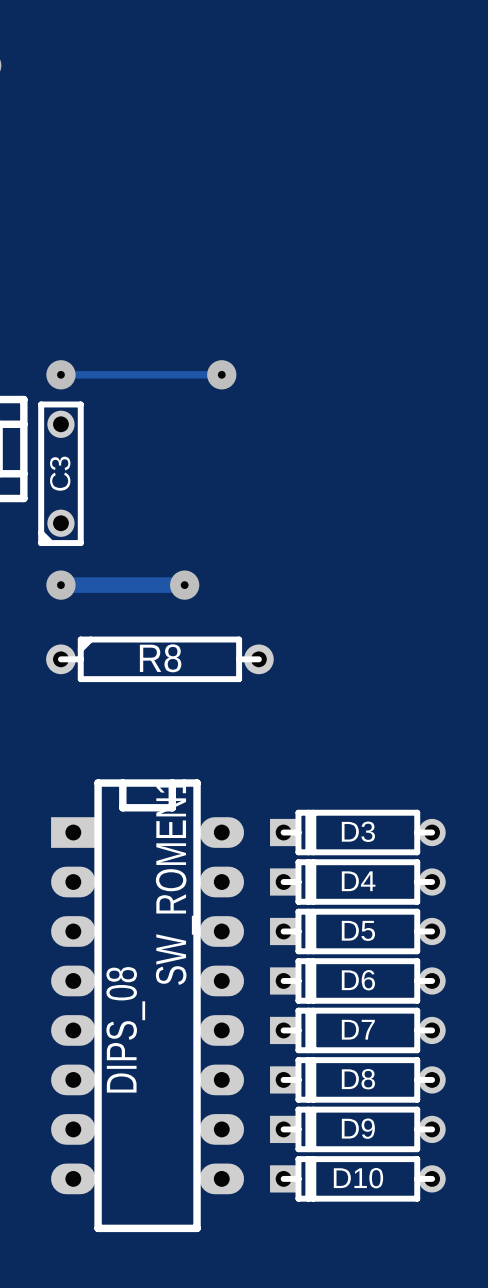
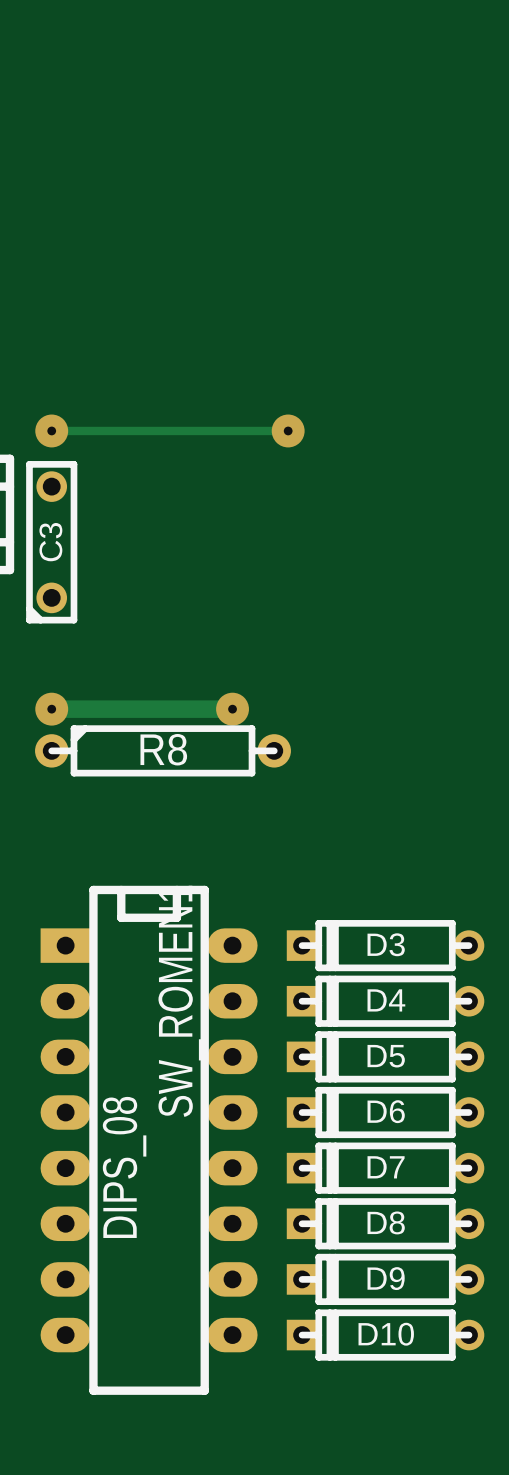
track: none -> (232, 430) (288, 430)
via position: (221, 374) -> (288, 430)
track: (60, 585) (184, 585) -> none
via position: (60, 585) -> (51, 709)
via position: (184, 585) -> (232, 709)
track: none -> (51, 709) (232, 709)

